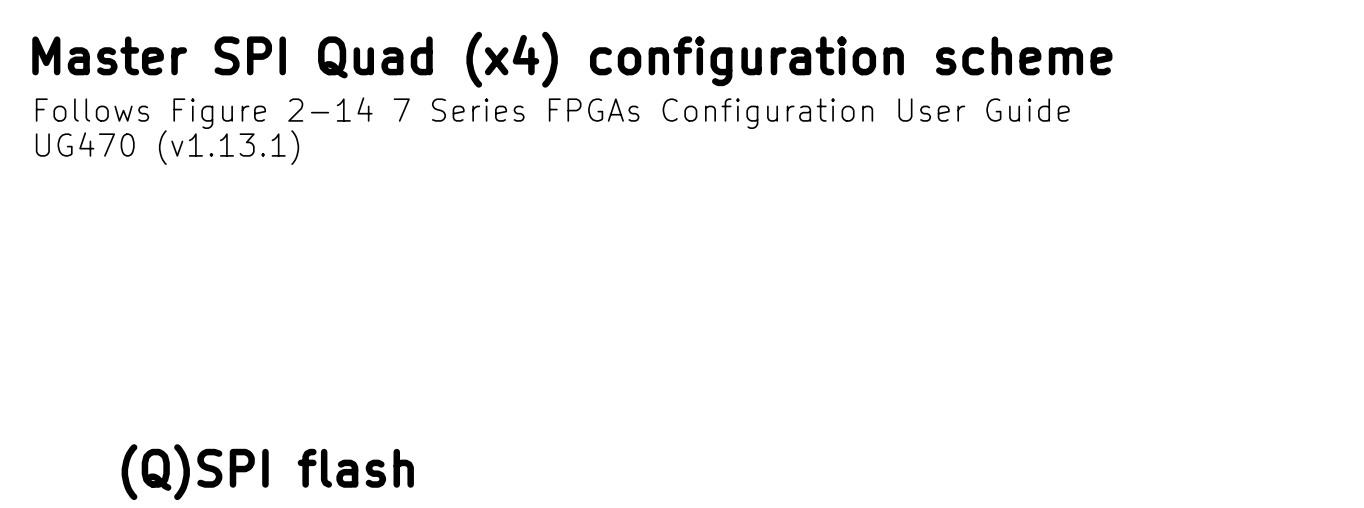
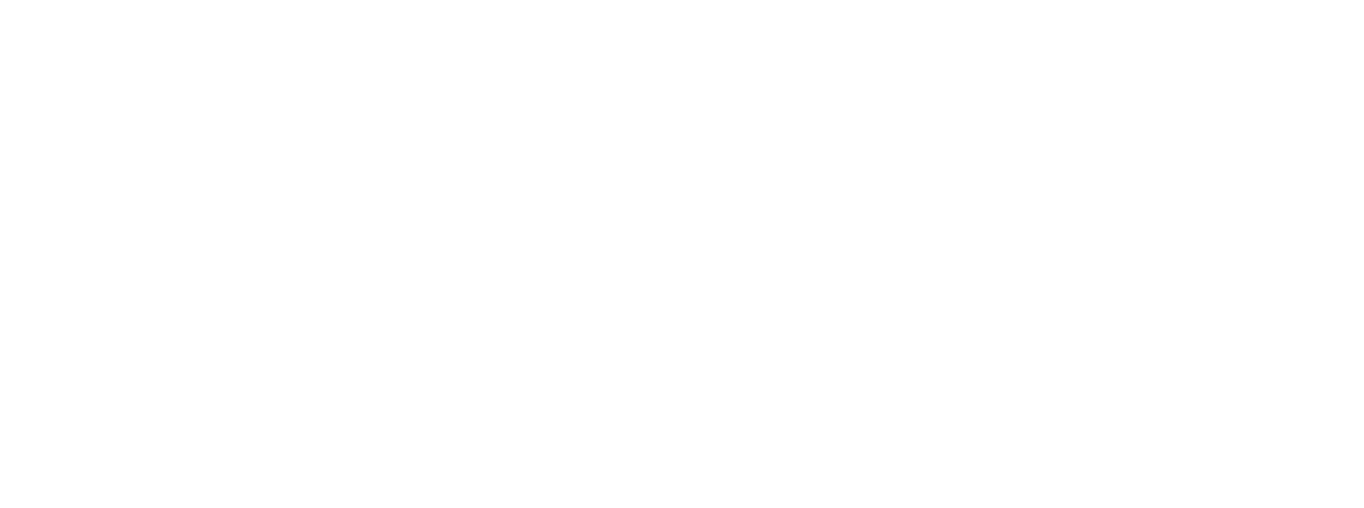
text: Master SPI Quad (x4) configuration scheme (572, 59) -> none
text: Follows Figure 2-14 7 Series FPGAs Configuration User Guide (552, 113) -> none
text: UG470 (v1.13.1) (167, 147) -> none
text: (Q)SPI flash (267, 472) -> none

